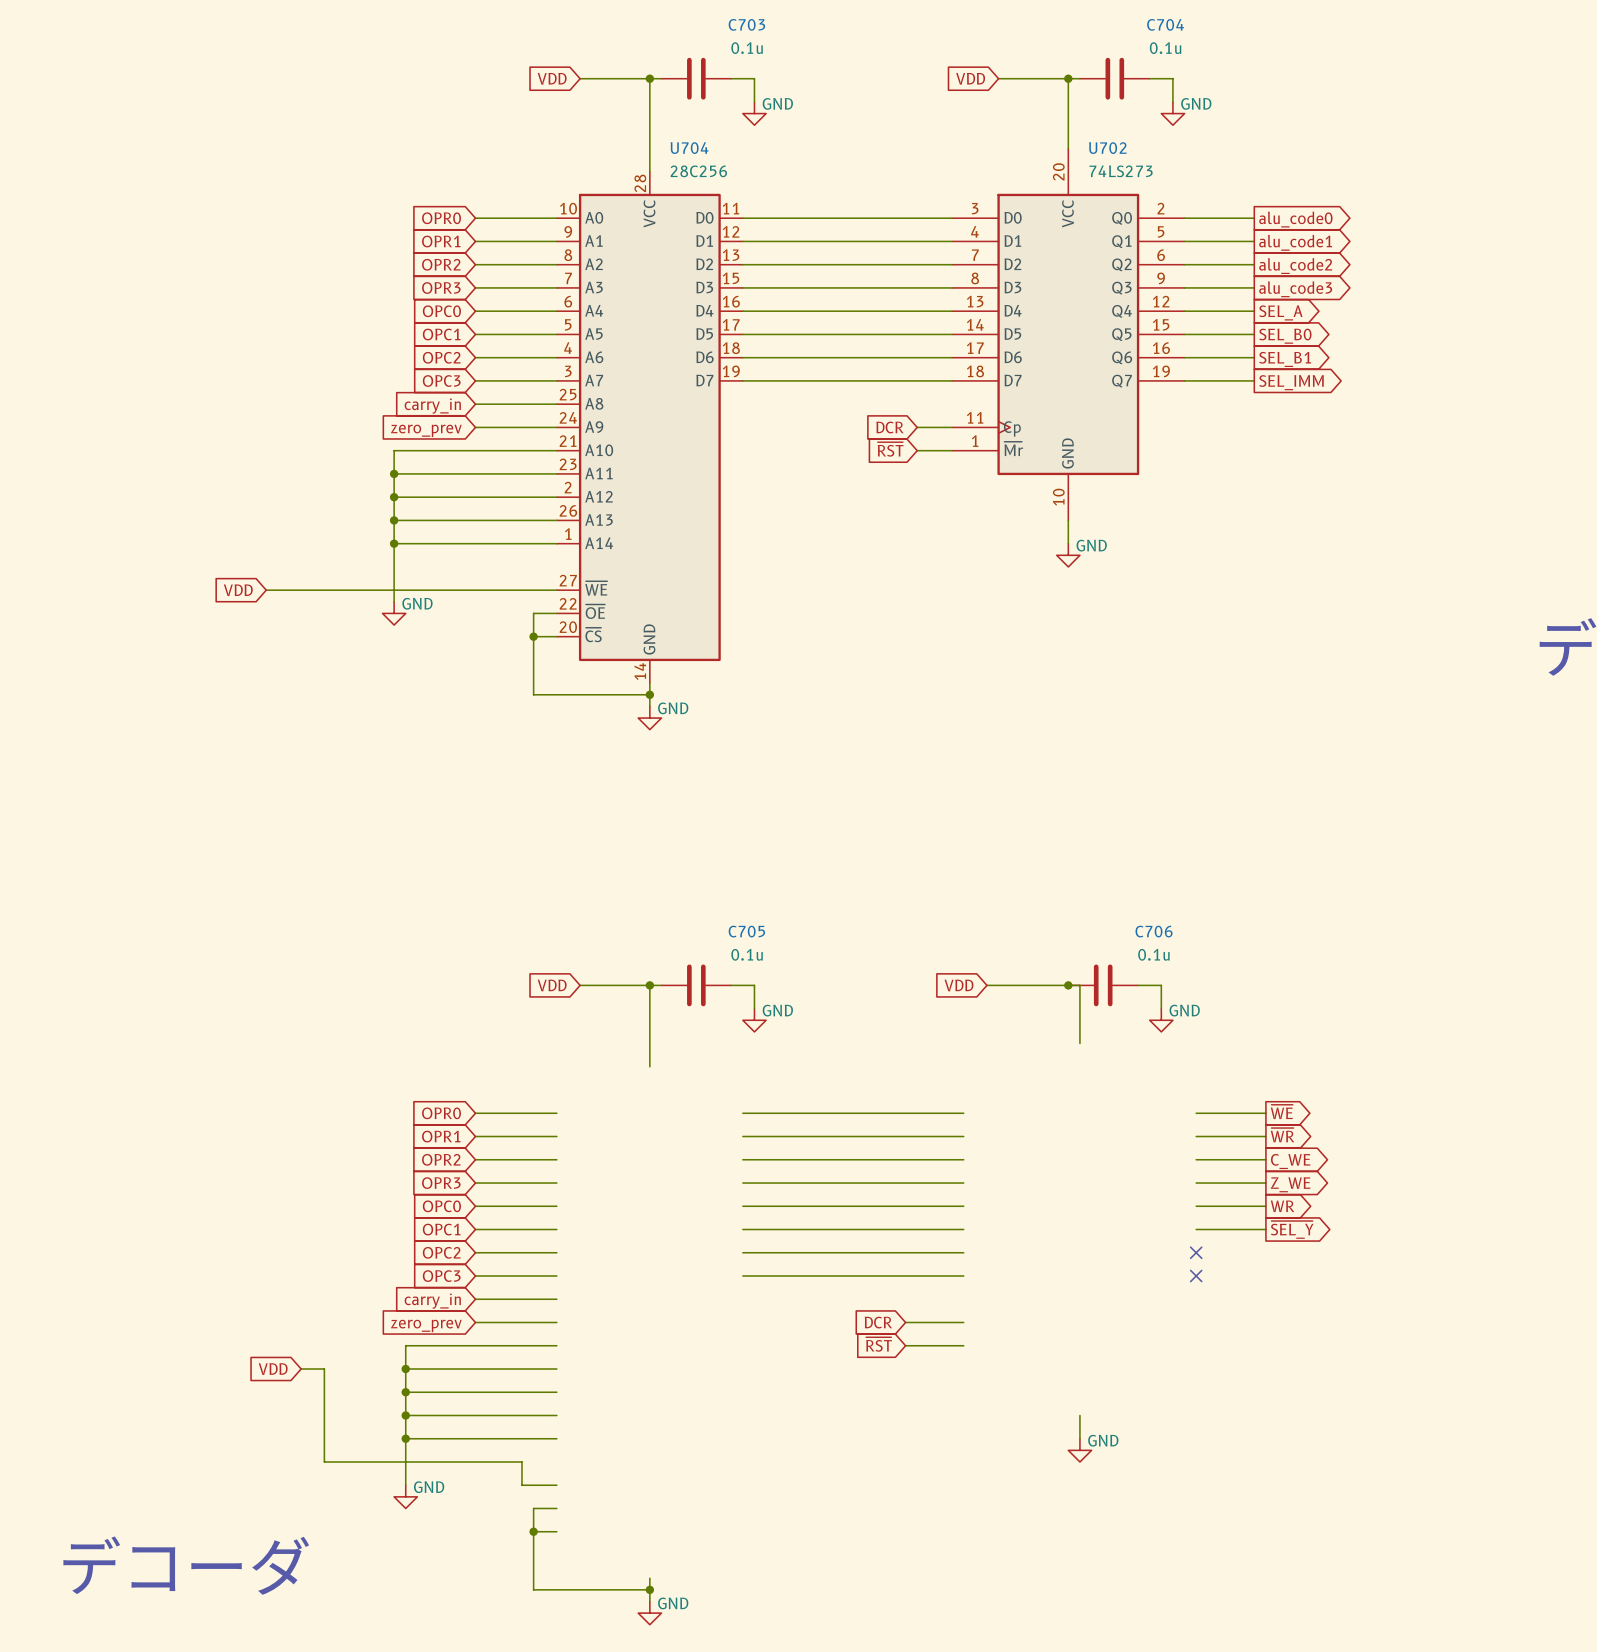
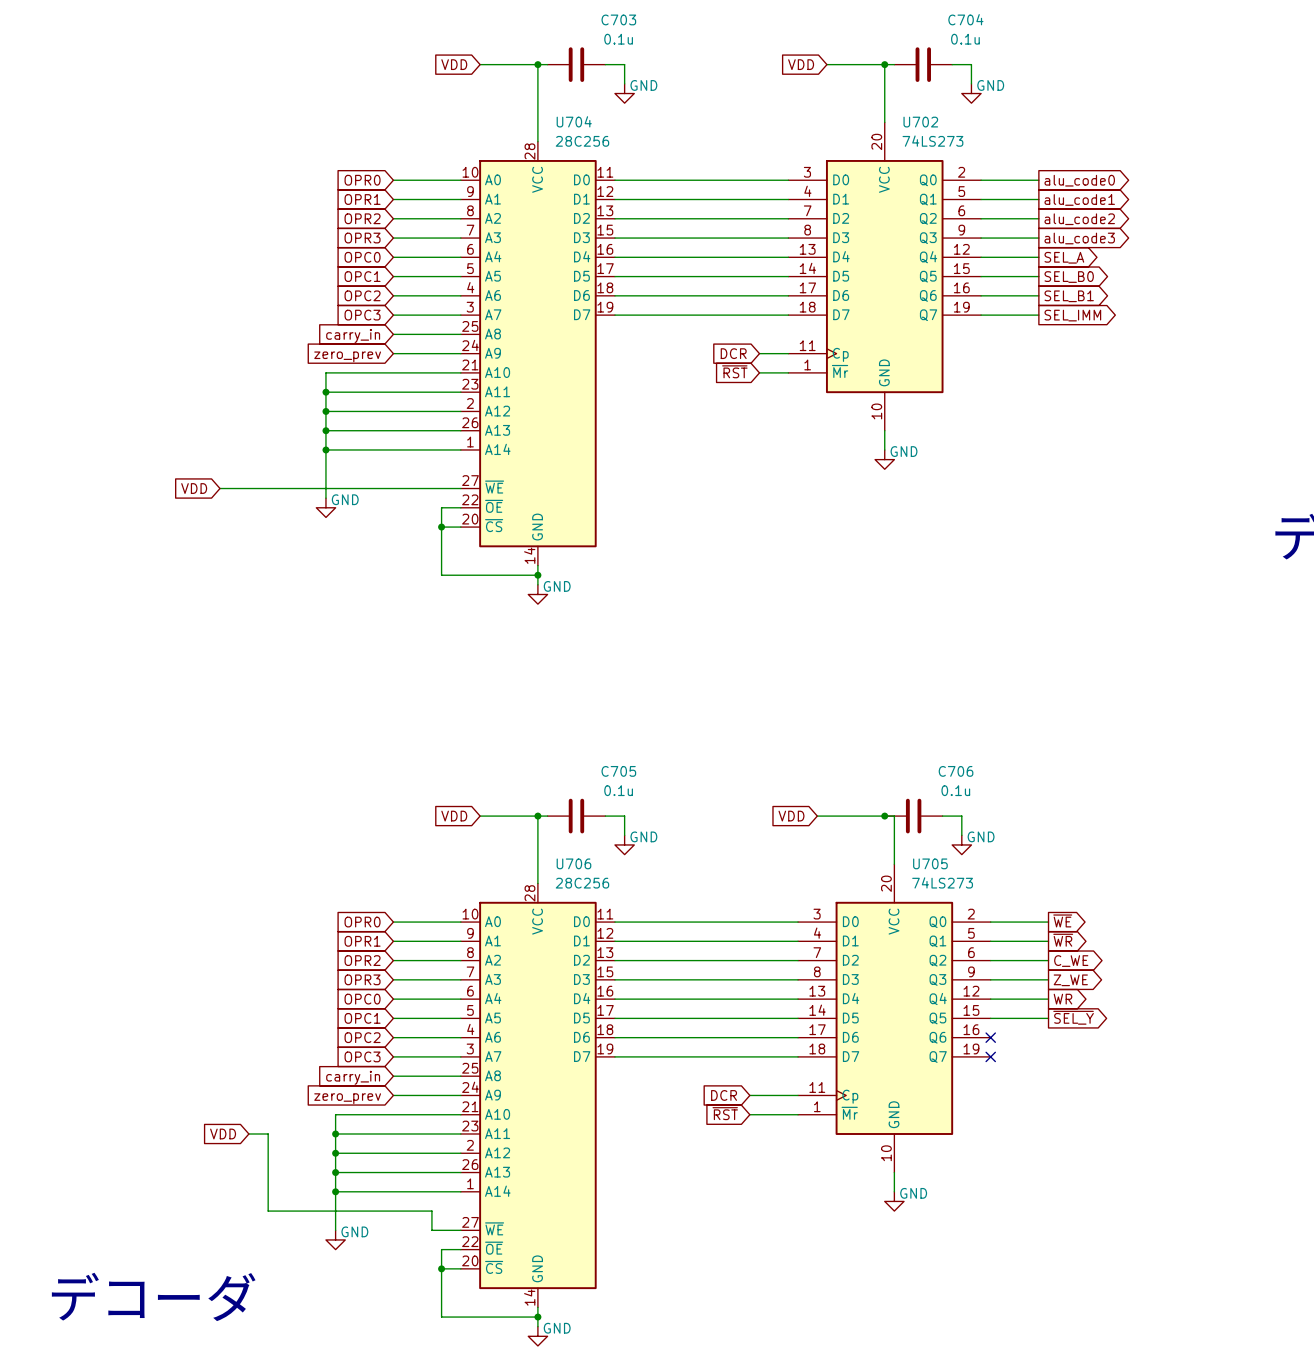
U705: none -> 74LS273 (894, 1018)
U706: none -> 28C256 (537, 1095)

